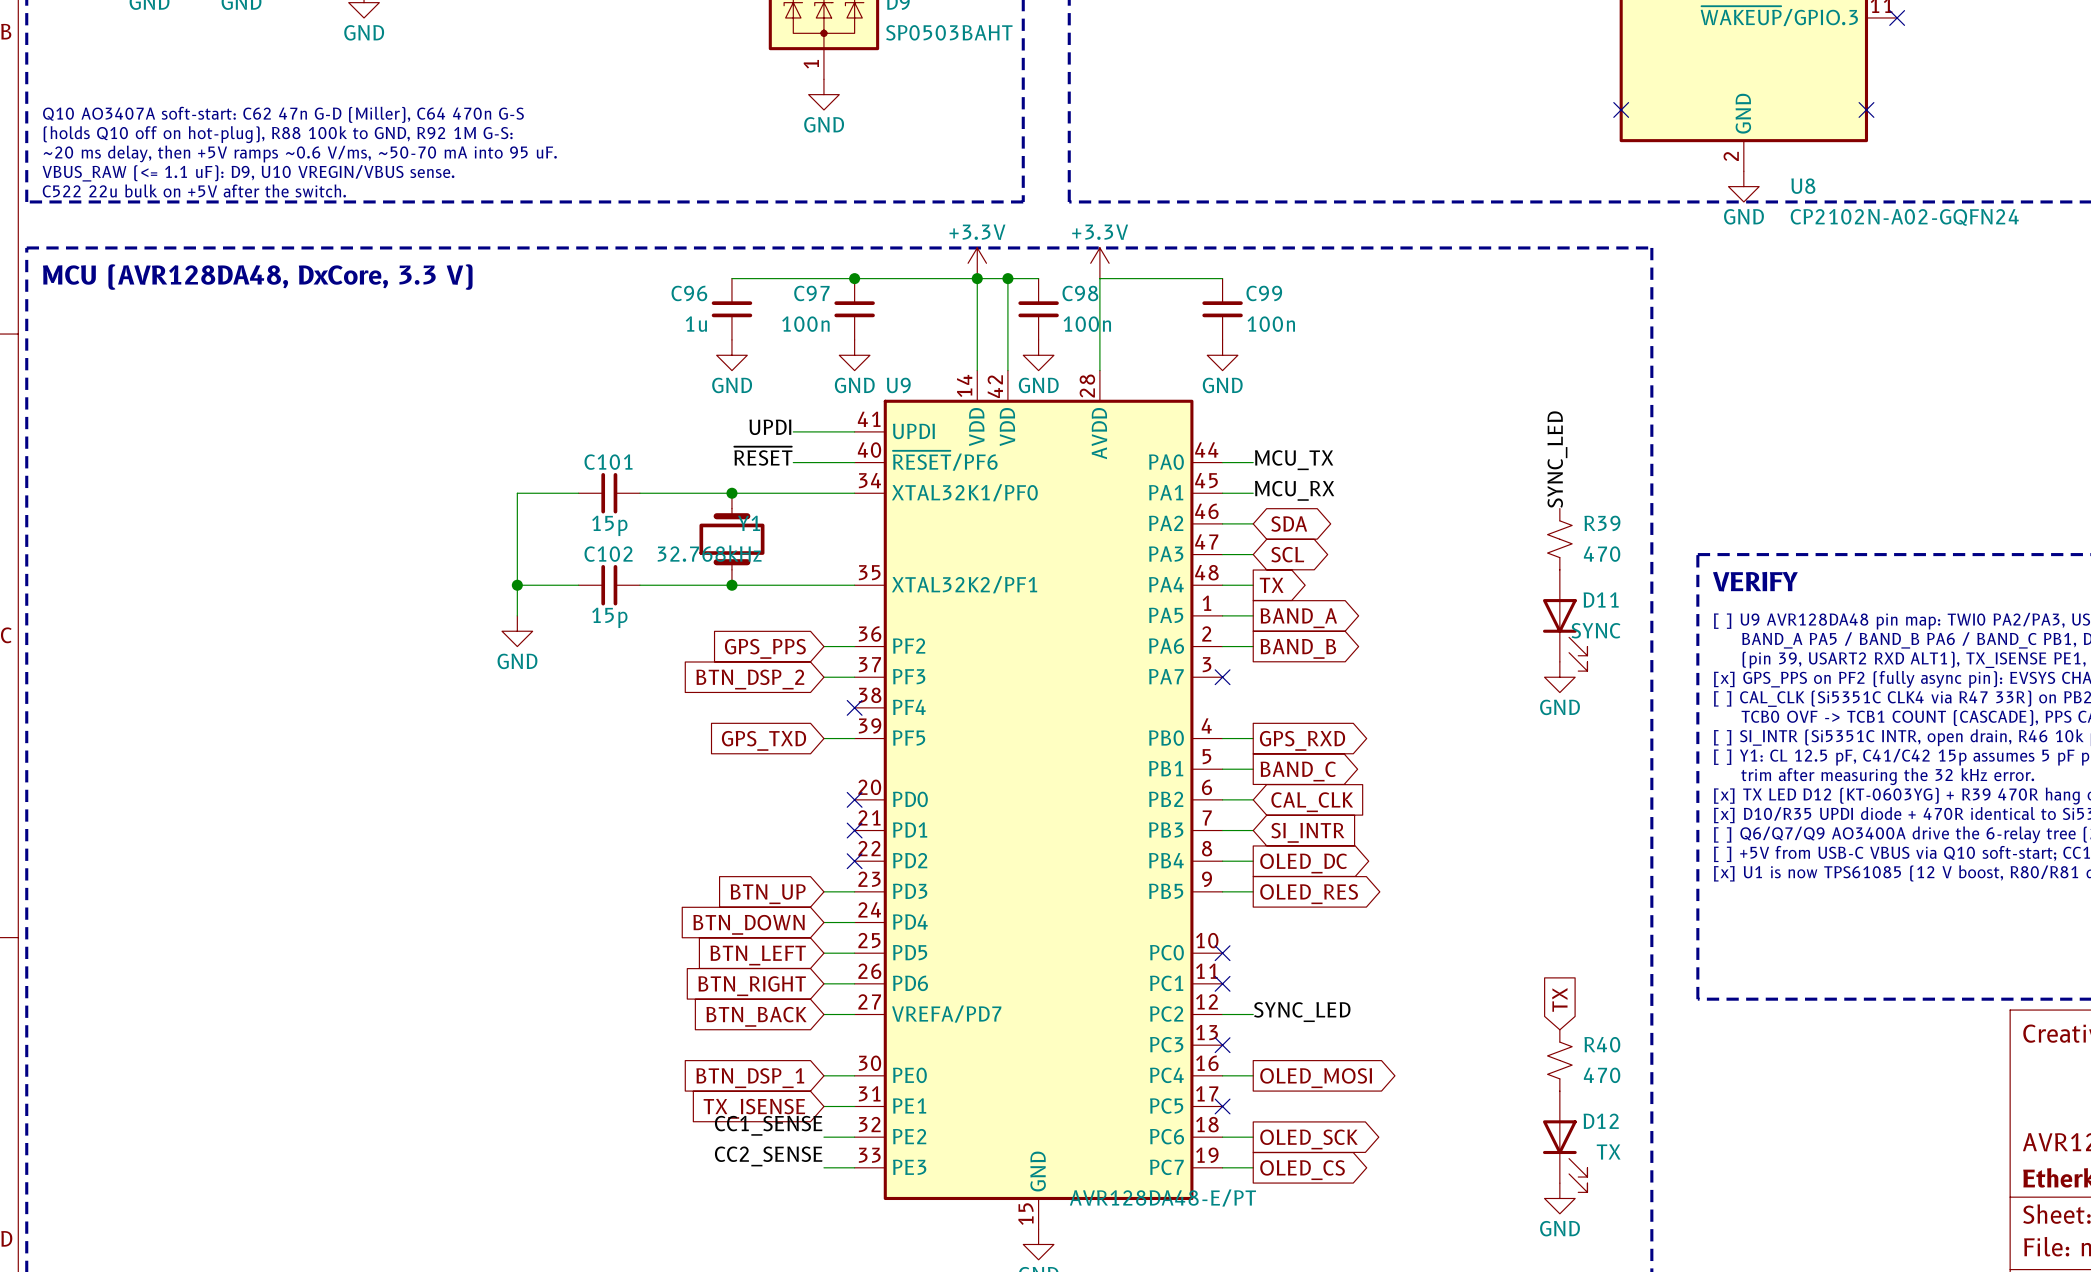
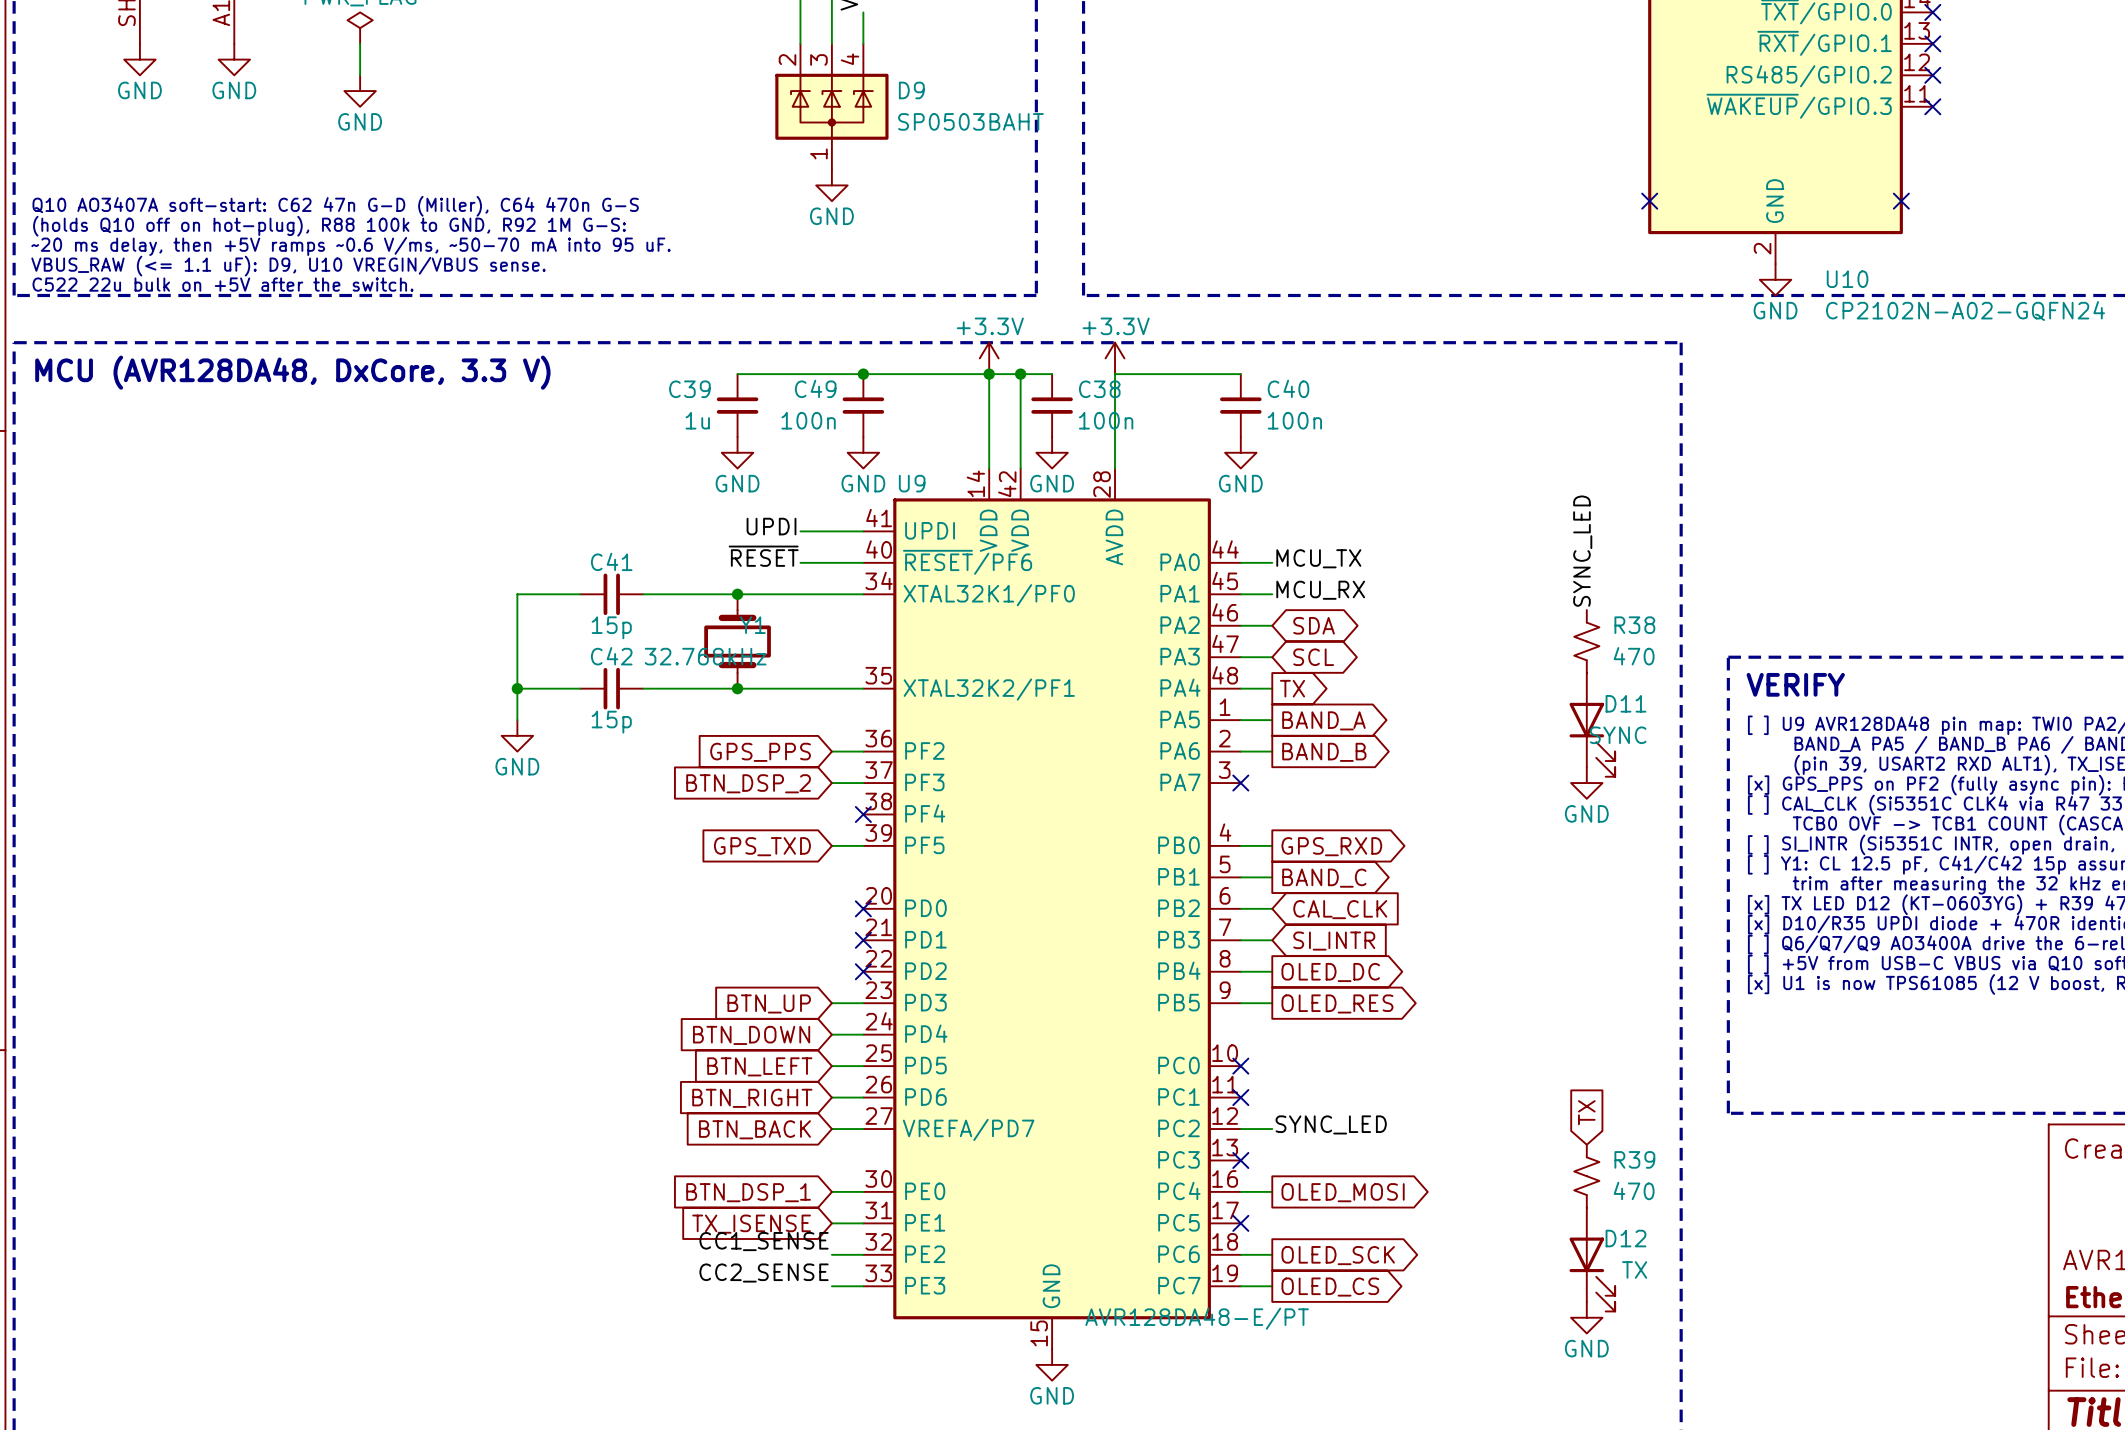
U8 name: U8 (1803, 186) -> U10 (1847, 279)
C96 name: C96 (689, 293) -> C39 (689, 389)
C97 name: C97 (811, 293) -> C49 (815, 388)
C98 name: C98 (1080, 293) -> C38 (1099, 389)
C99 name: C99 (1264, 293) -> C40 (1288, 388)
C101 name: C101 (608, 462) -> C41 (611, 561)
R39 name: R39 (1602, 523) -> R38 (1634, 625)
C102 name: C102 (608, 554) -> C42 (611, 656)
R40 name: R40 (1602, 1044) -> R39 (1634, 1159)

